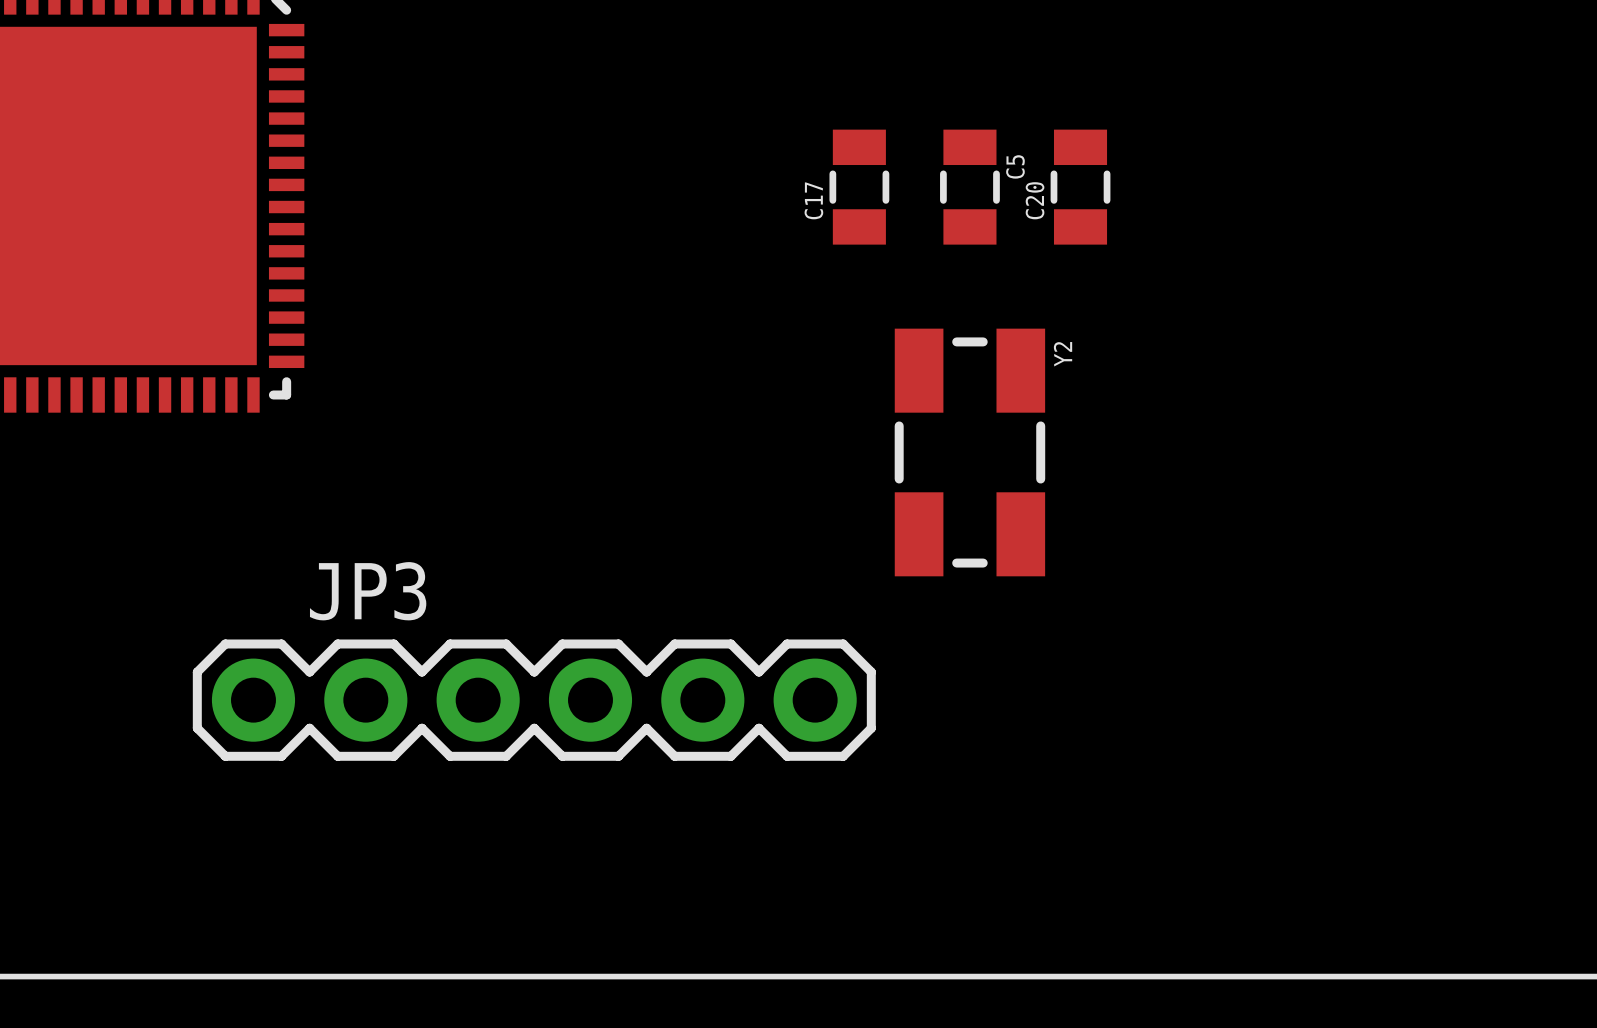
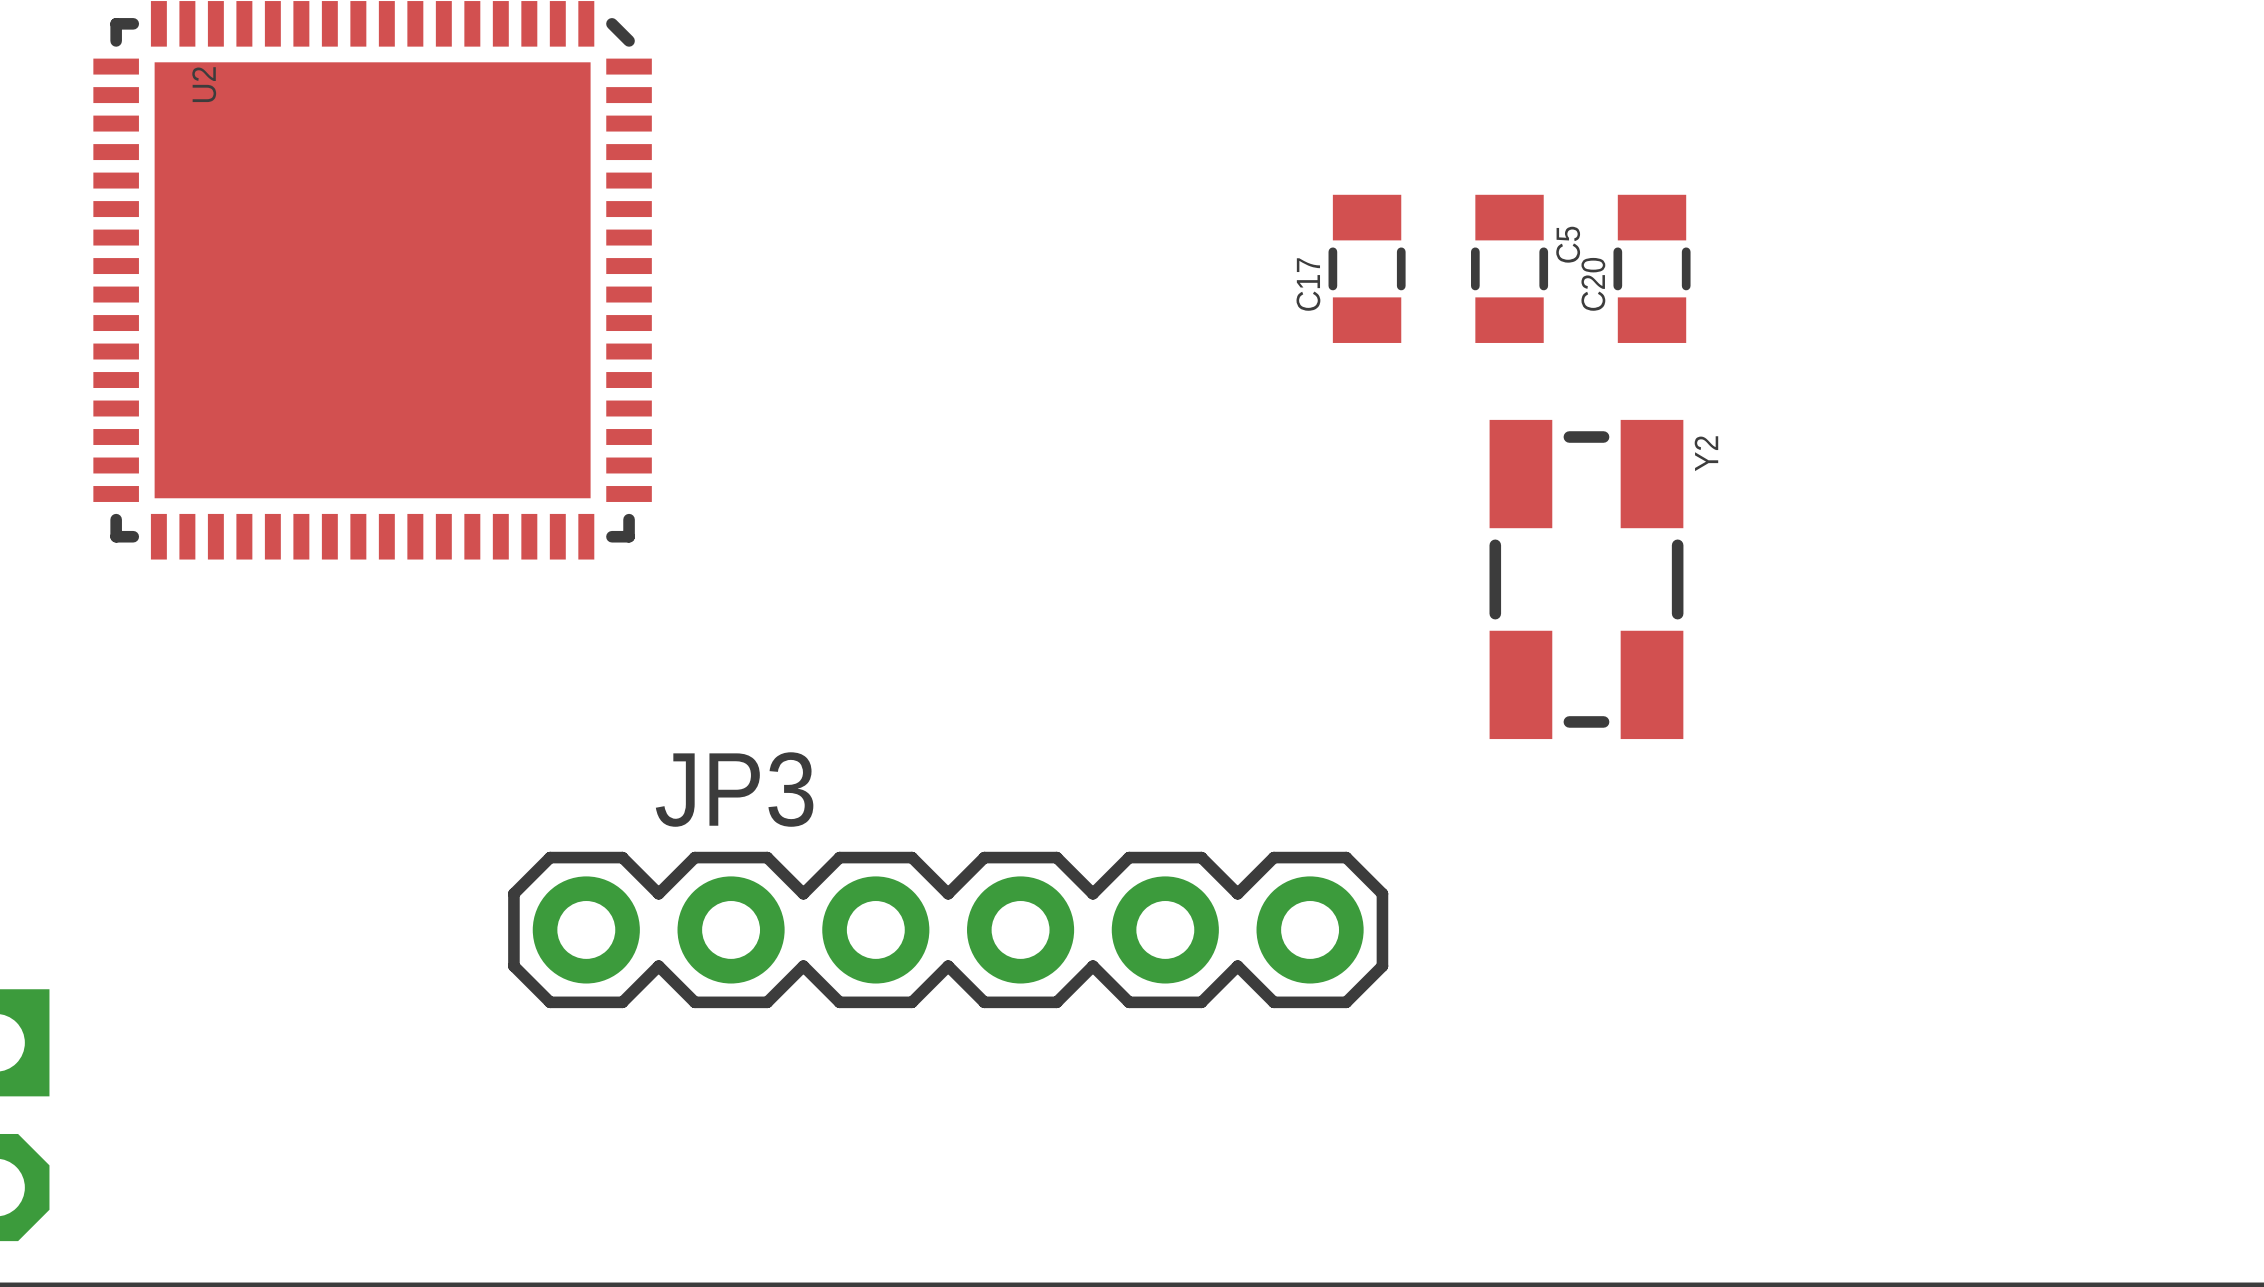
Y2 position: (969, 452) -> (1586, 579)

